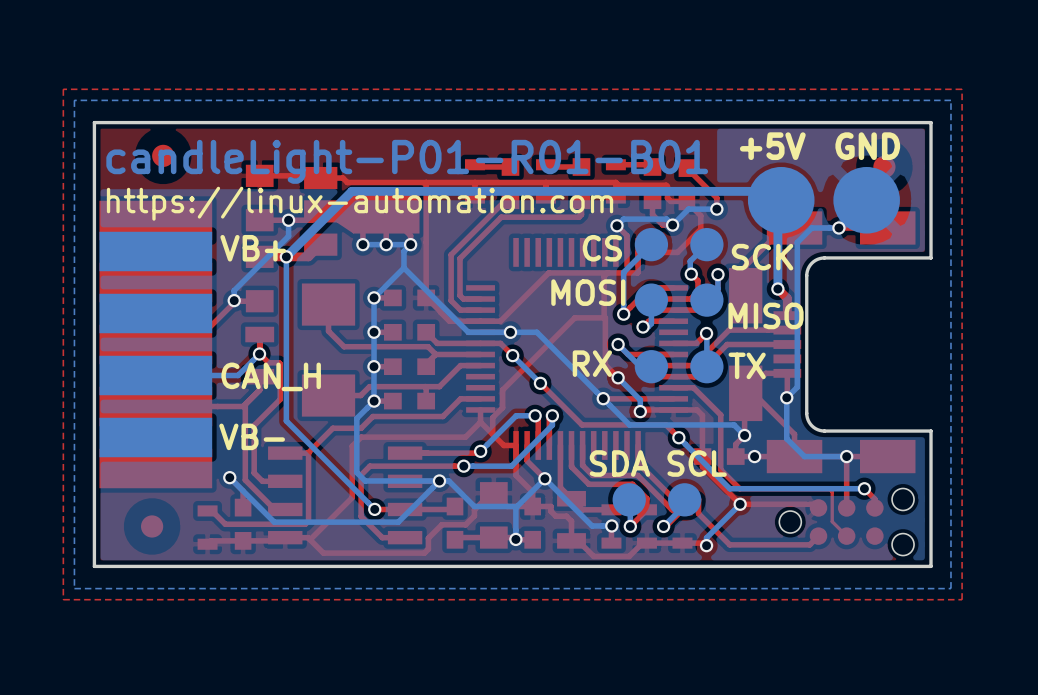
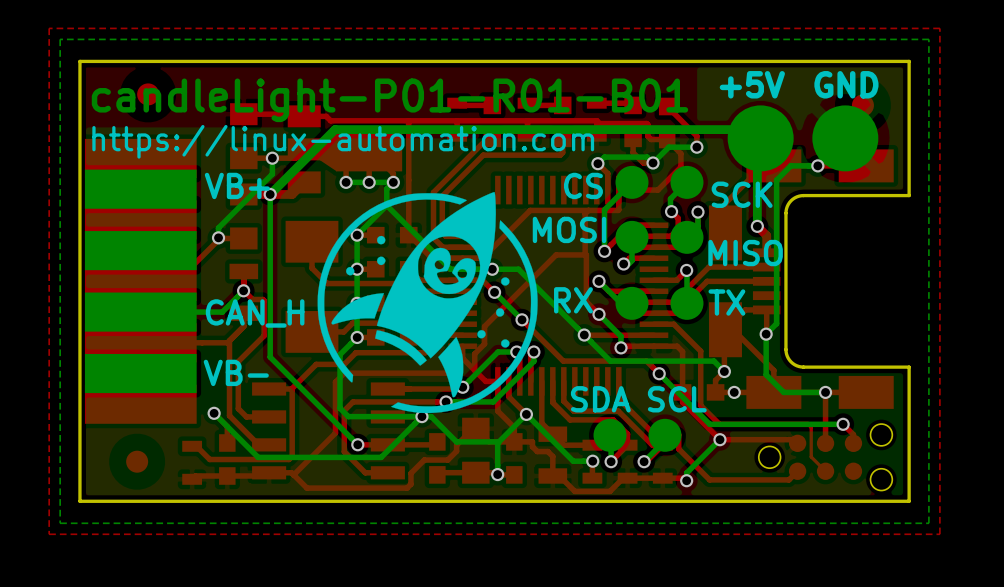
drawing: none -> [317, 192, 538, 414]

